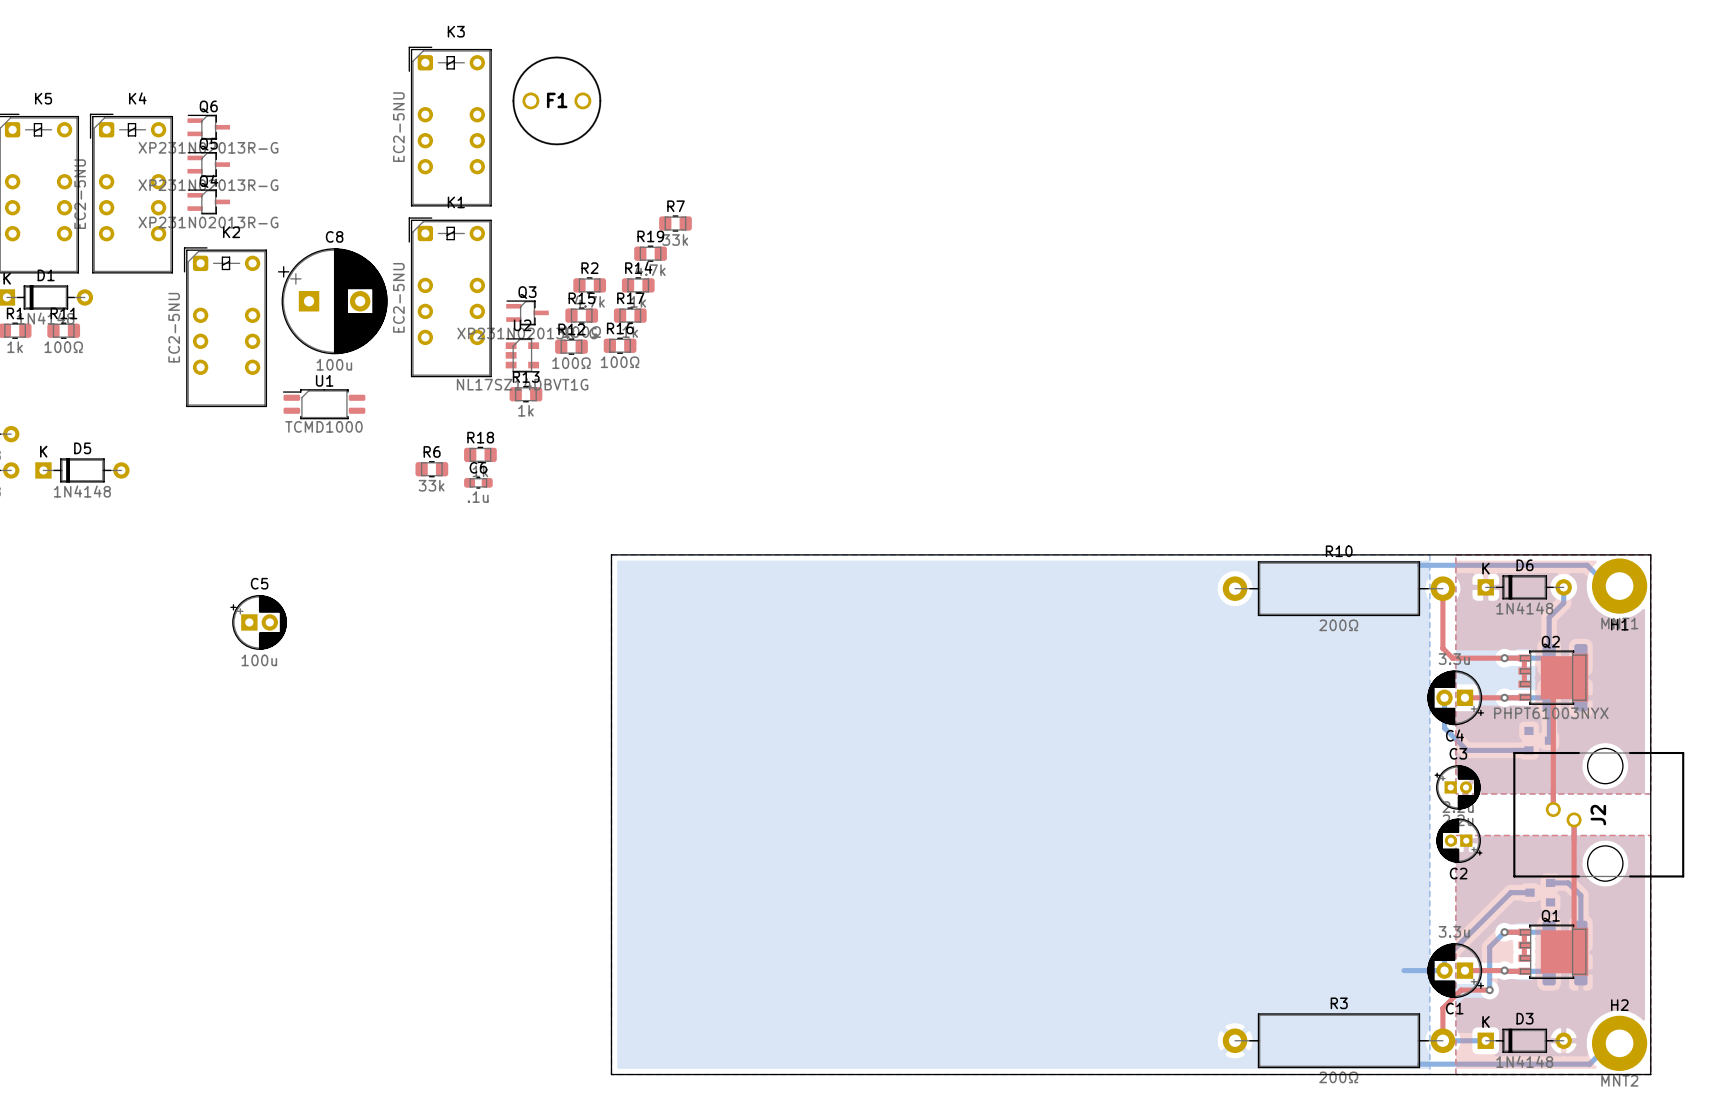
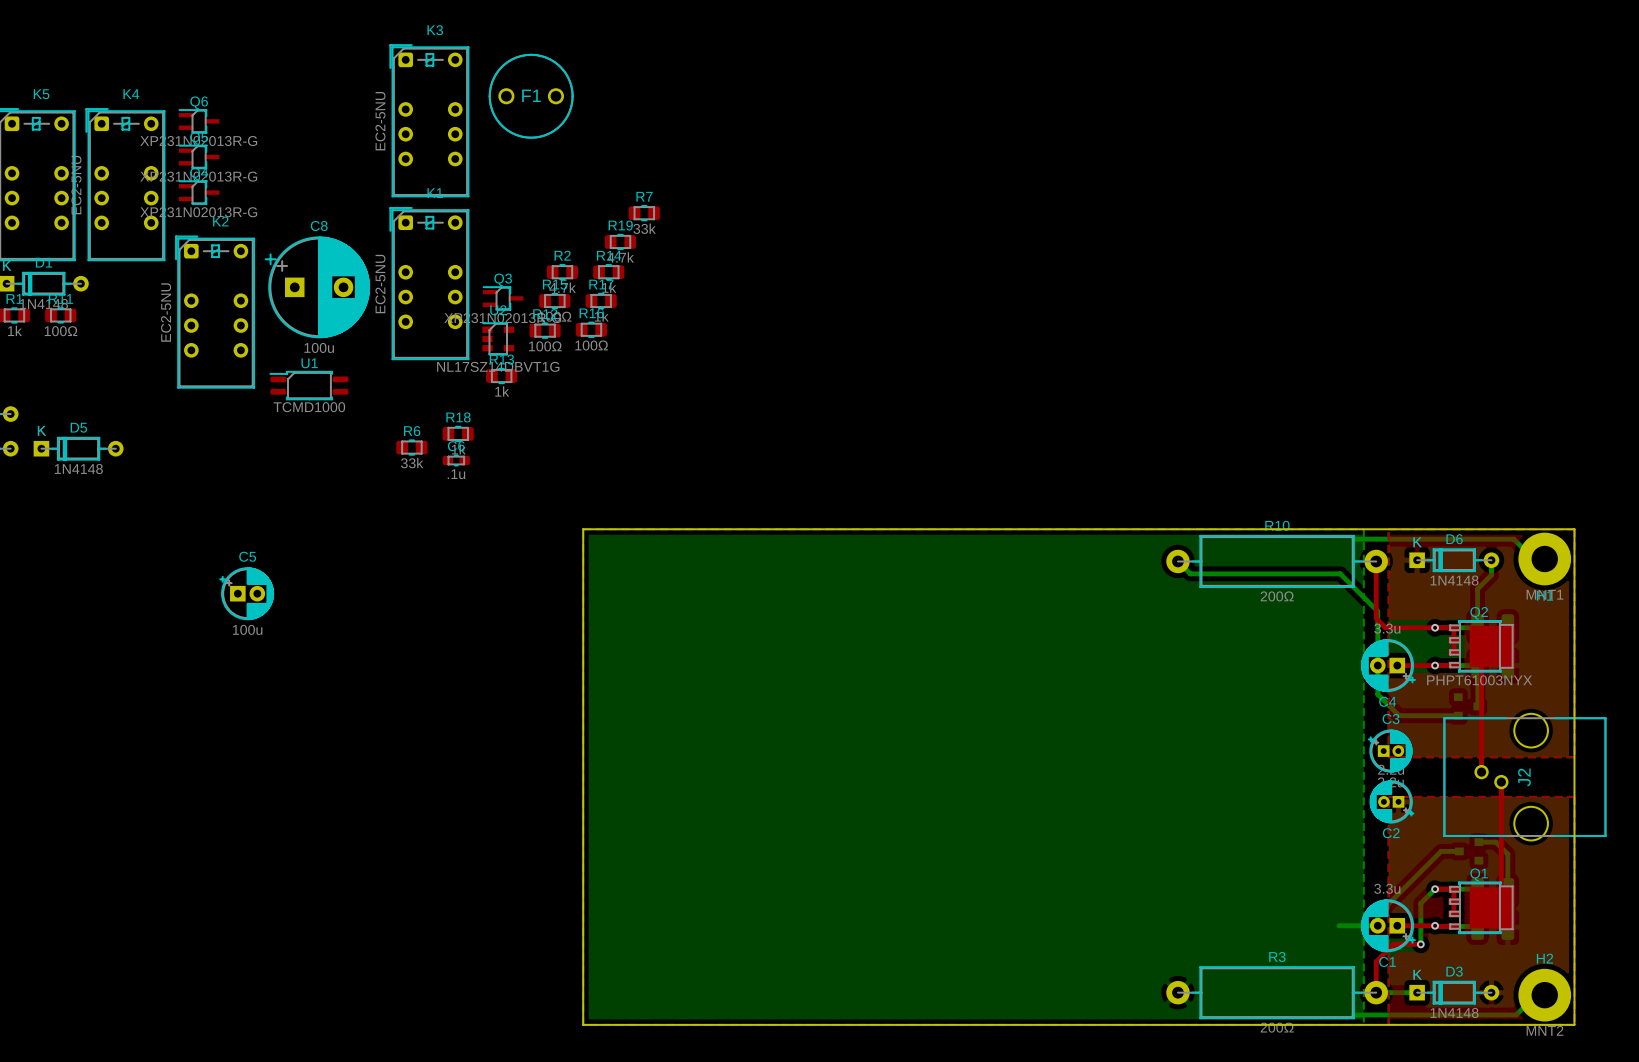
bottom track: none -> (1177, 561) (1190, 573) (1340, 573) (1377, 611) (1377, 665)

